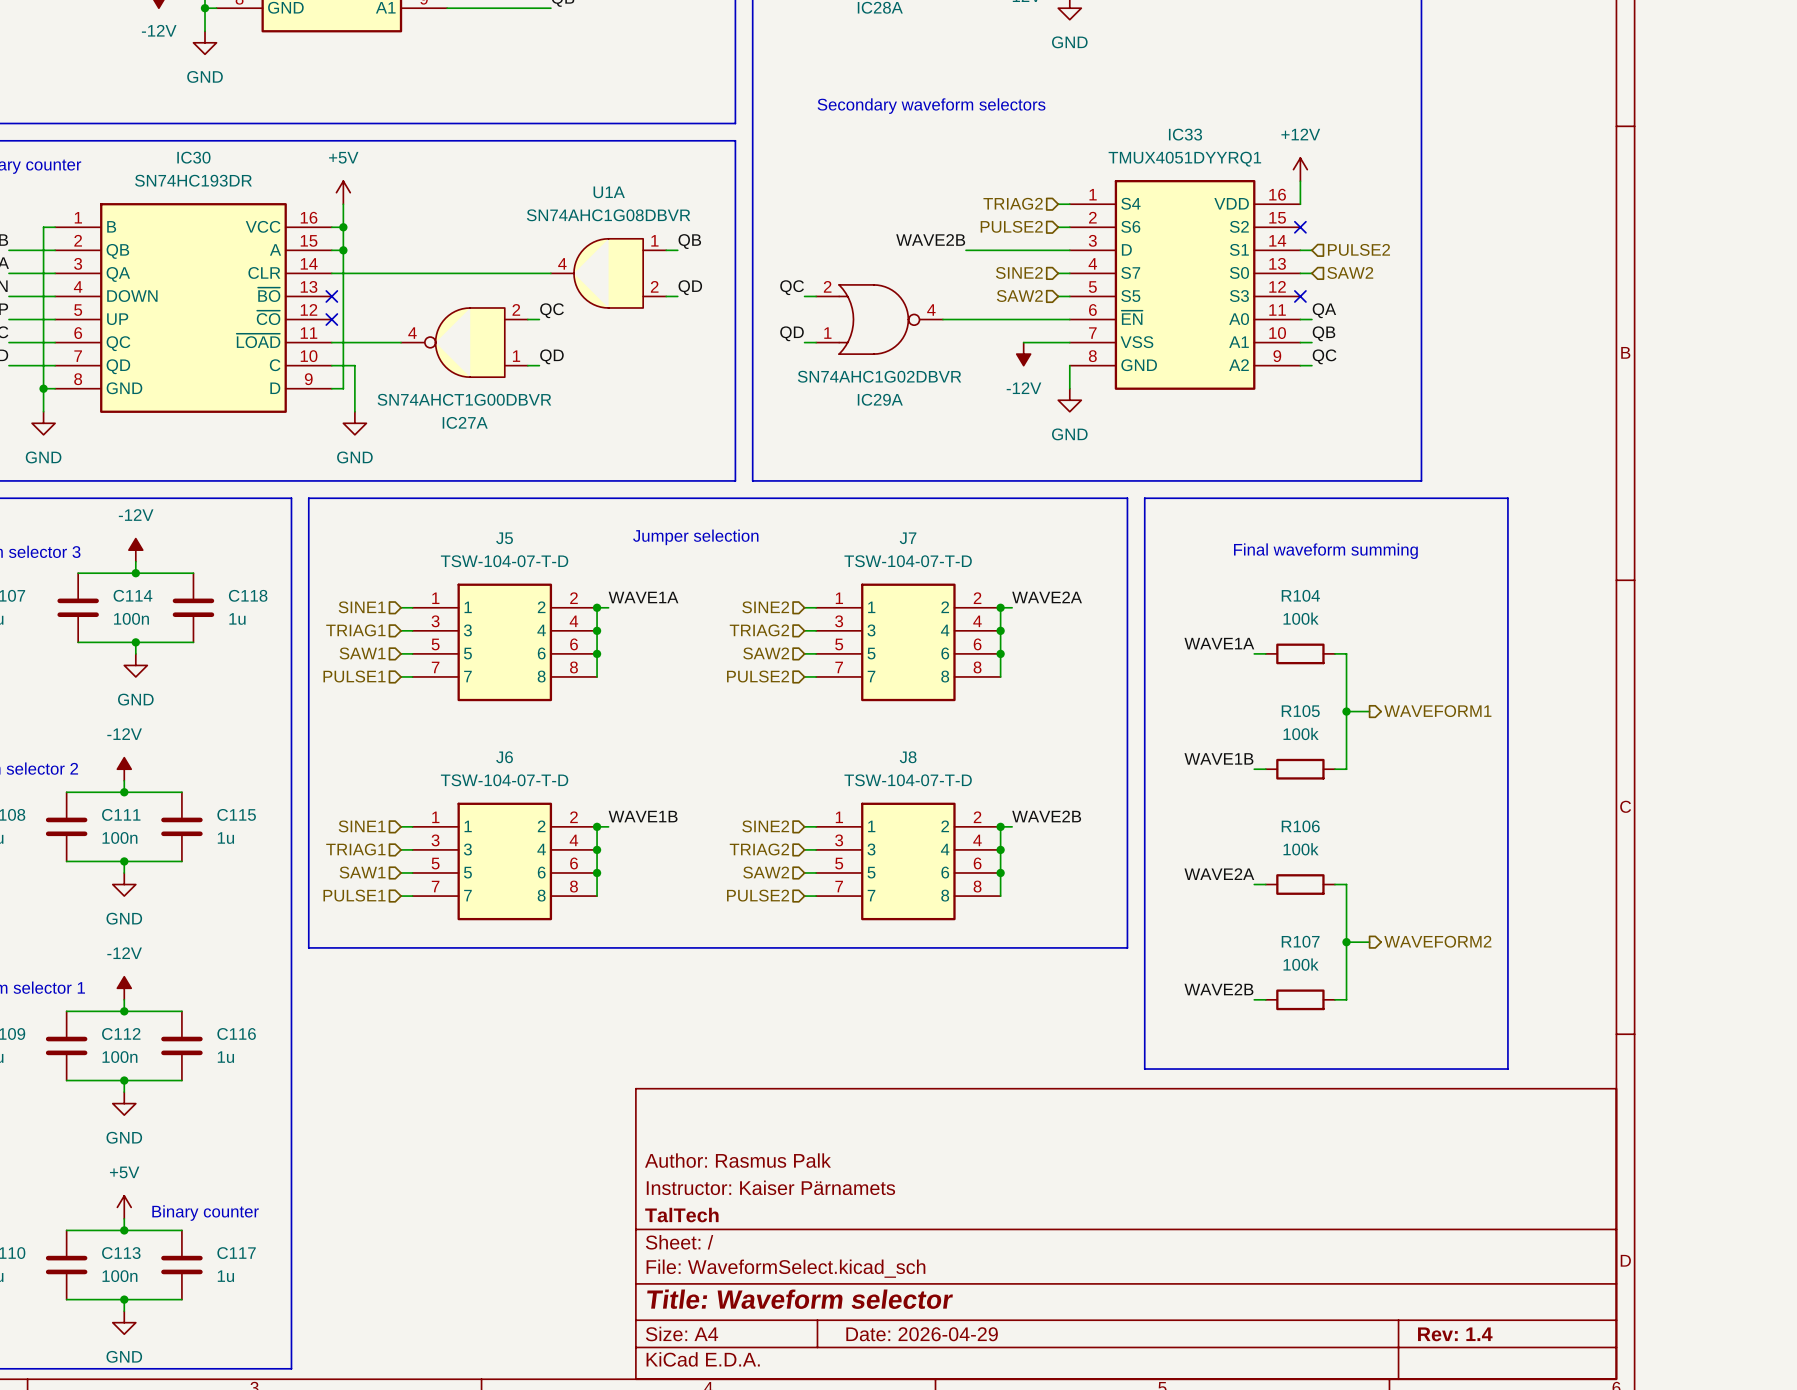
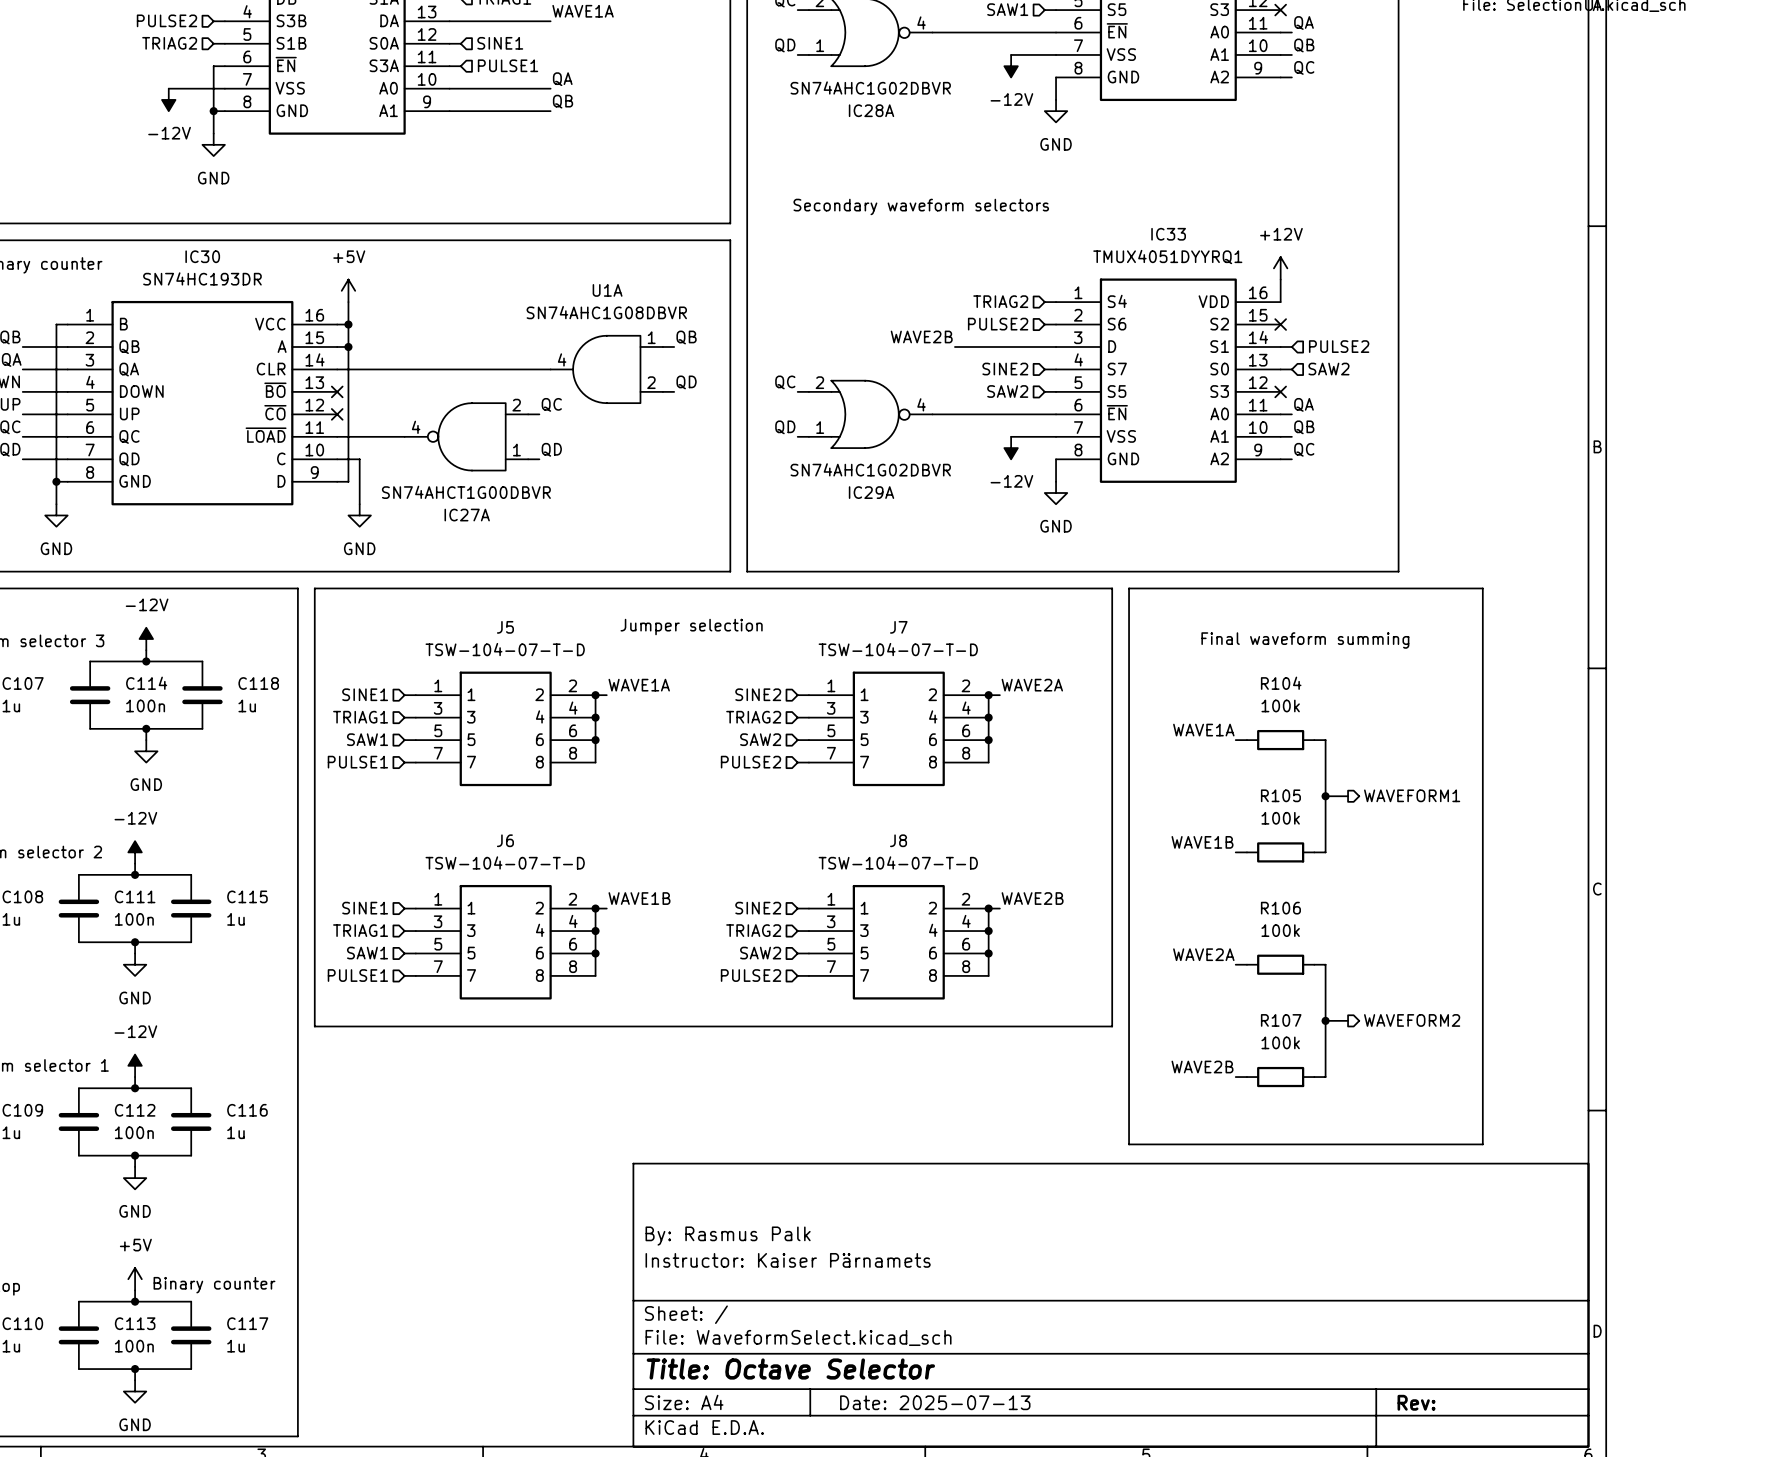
title block: Author: Rasmus Palk (737, 1160) -> By: Rasmus Palk (728, 1236)
title block: TalTech (681, 1215) -> none
title block: Title: Waveform selector (800, 1299) -> Title: Octave Selector (790, 1369)
title block: Date: 2026-04-29 (922, 1334) -> Date: 2025-07-13 (935, 1402)
title block: Rev: 1.4 (1455, 1334) -> Rev: (1416, 1402)

